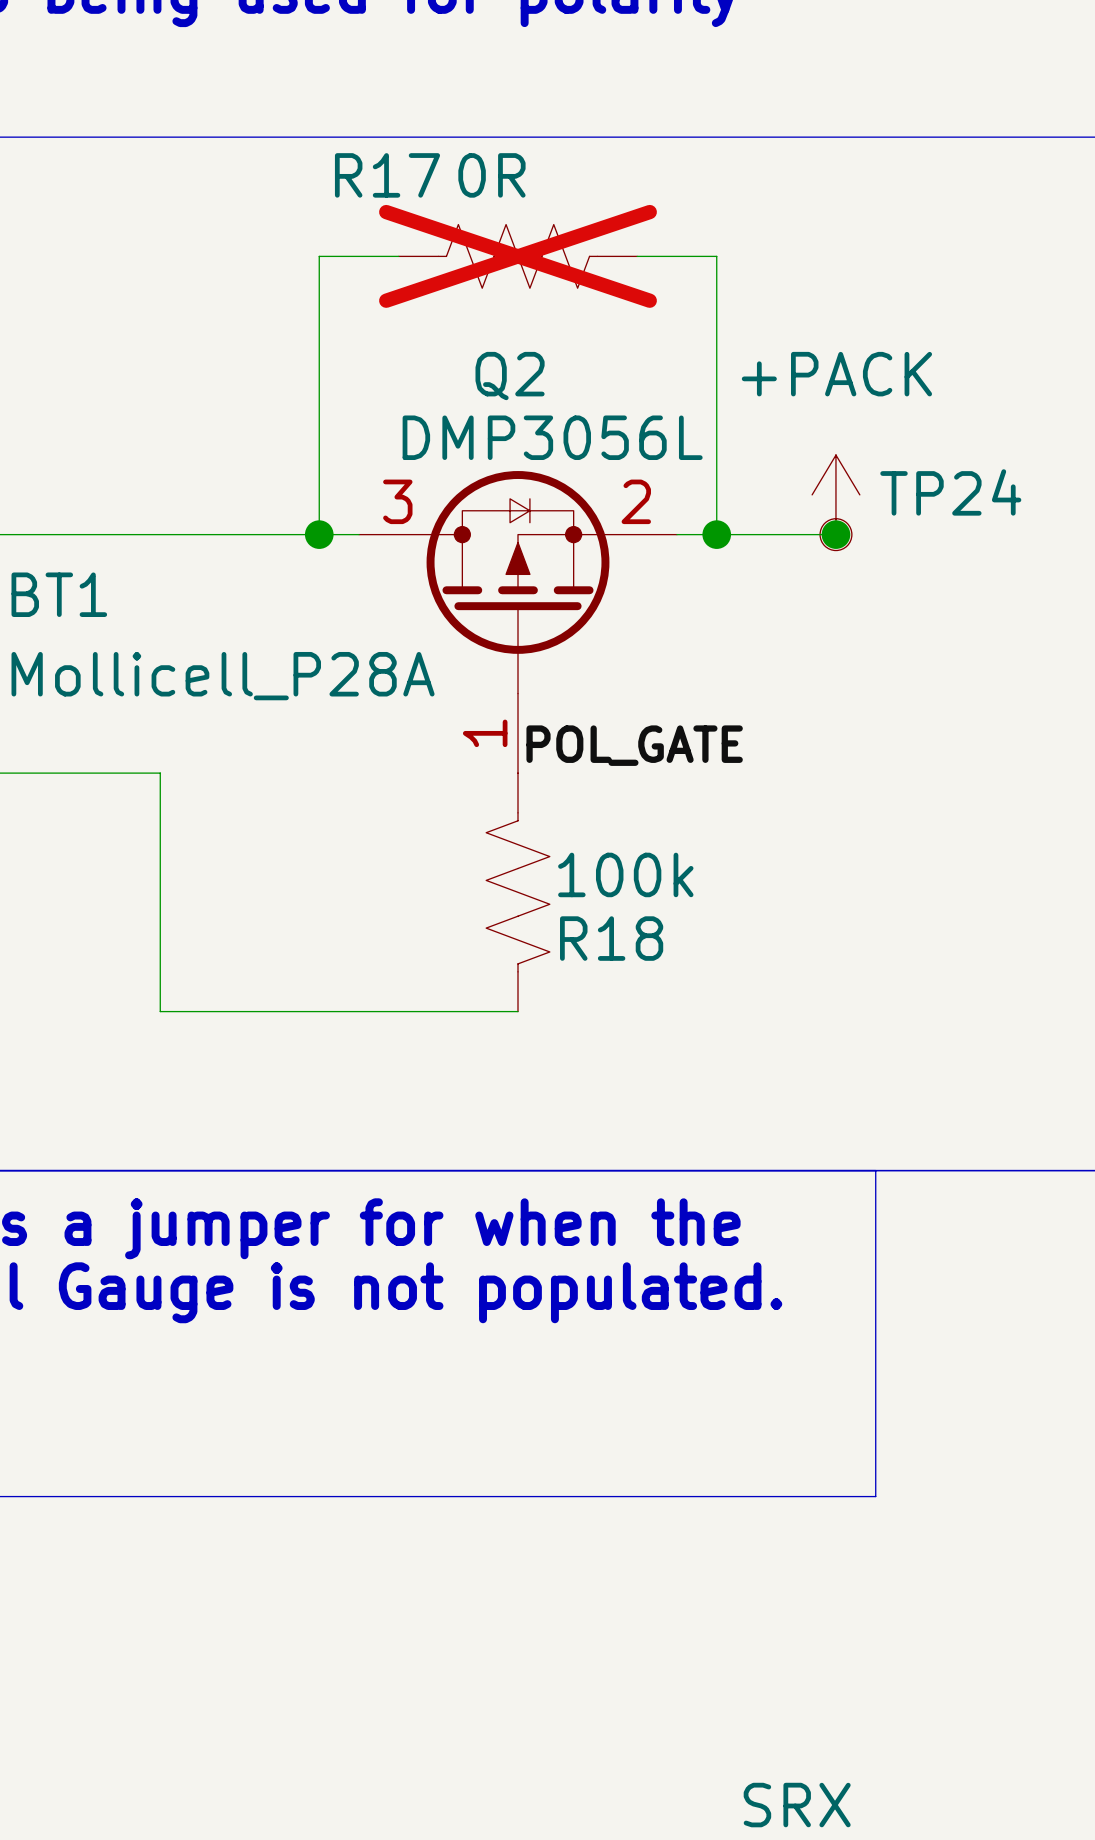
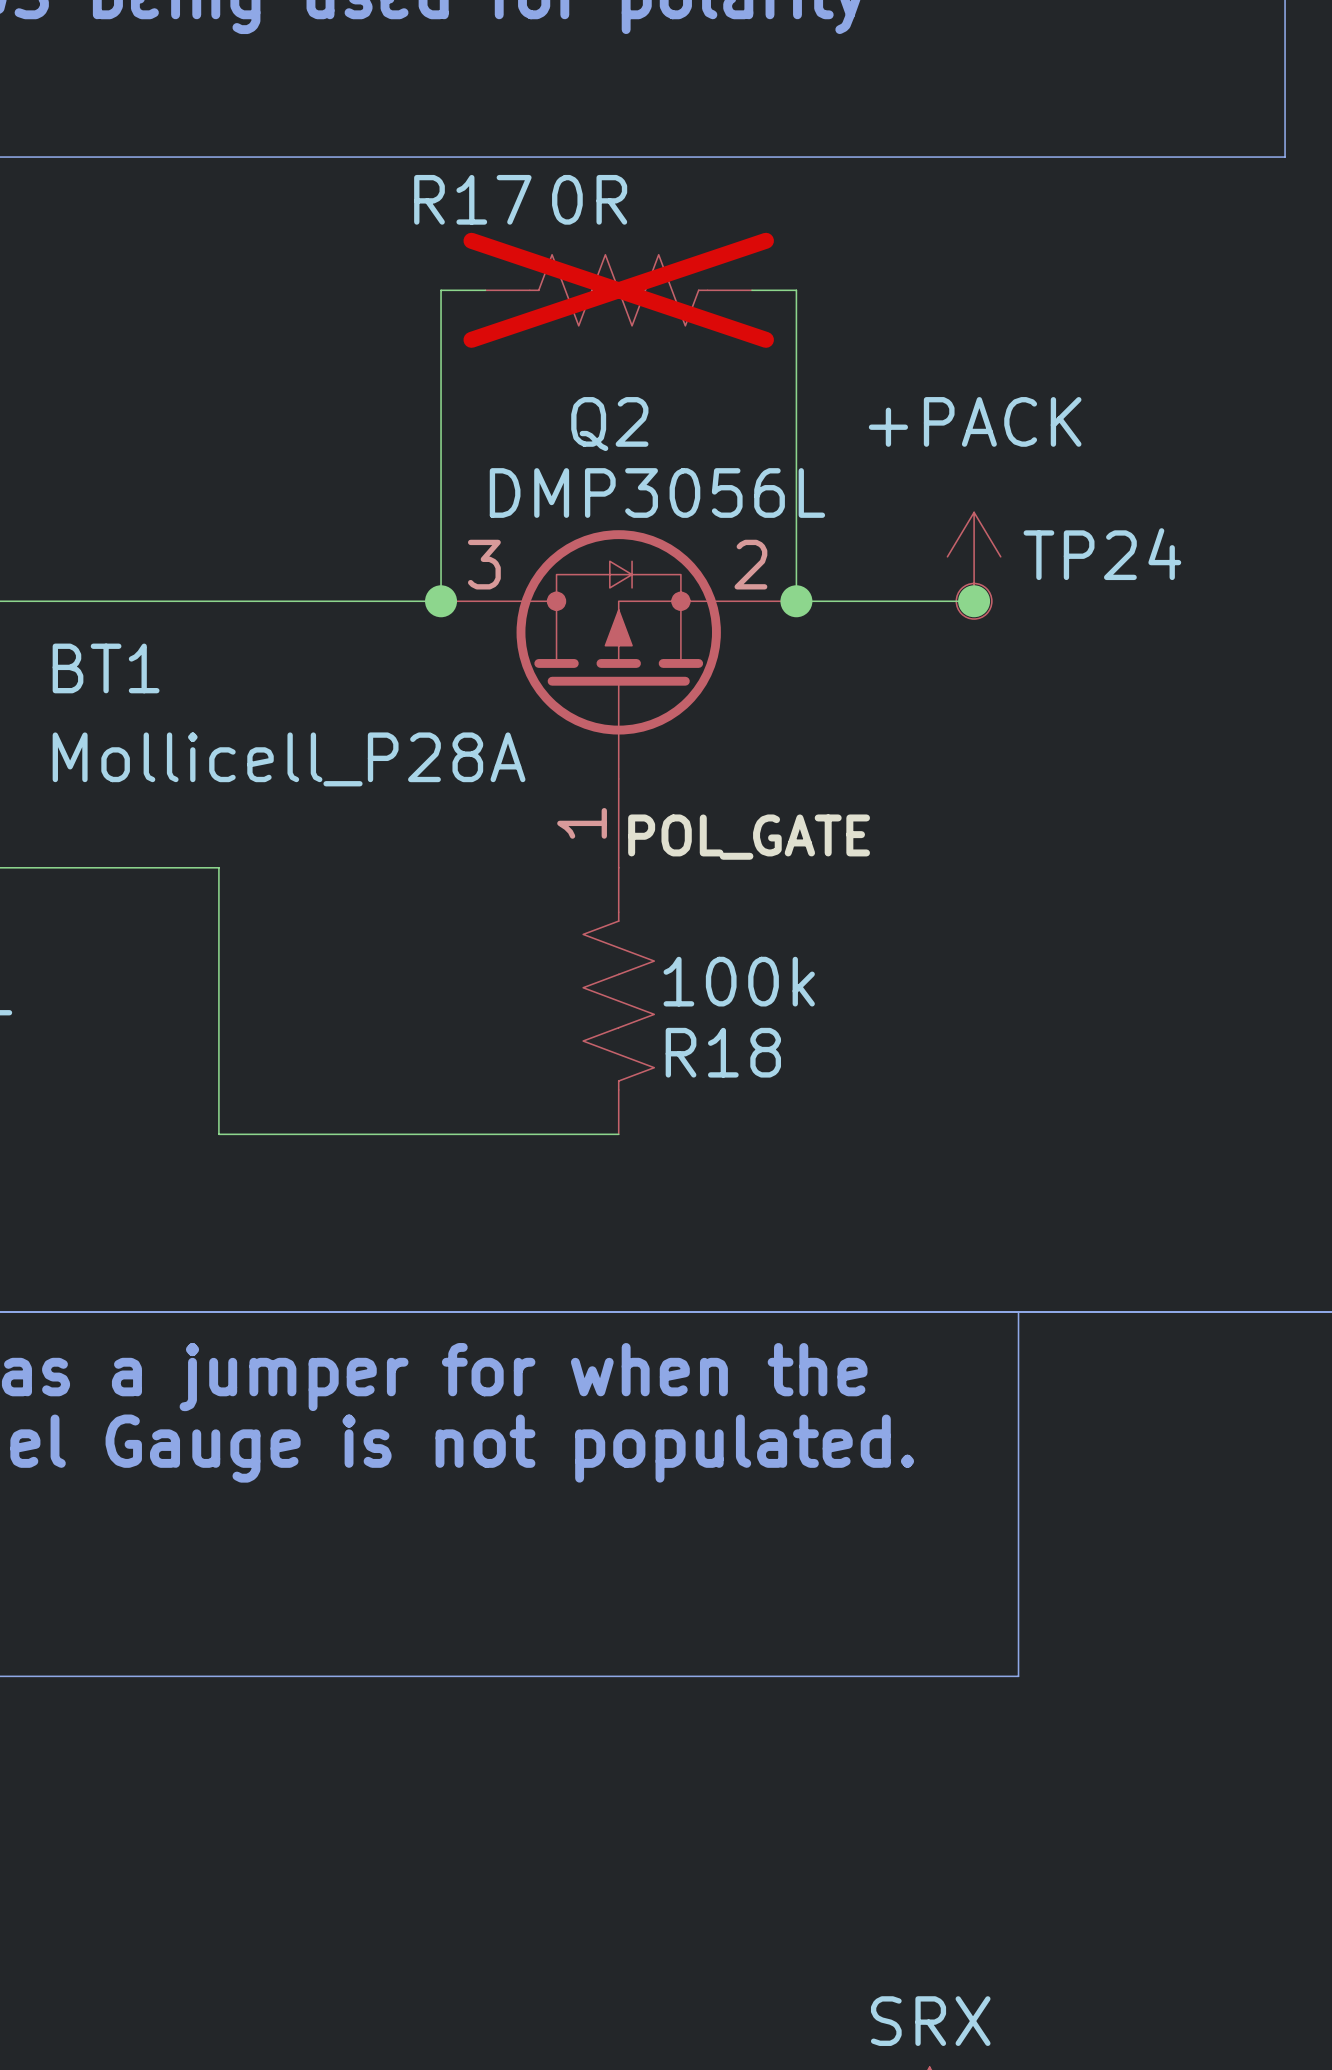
wire: (359, 256) (319, 256) (319, 534) -> (441, 290) (441, 601)
wire: (676, 256) (716, 256) (716, 534) -> (796, 290) (796, 601)
junction position: (319, 534) -> (441, 601)
junction position: (716, 534) -> (796, 601)

